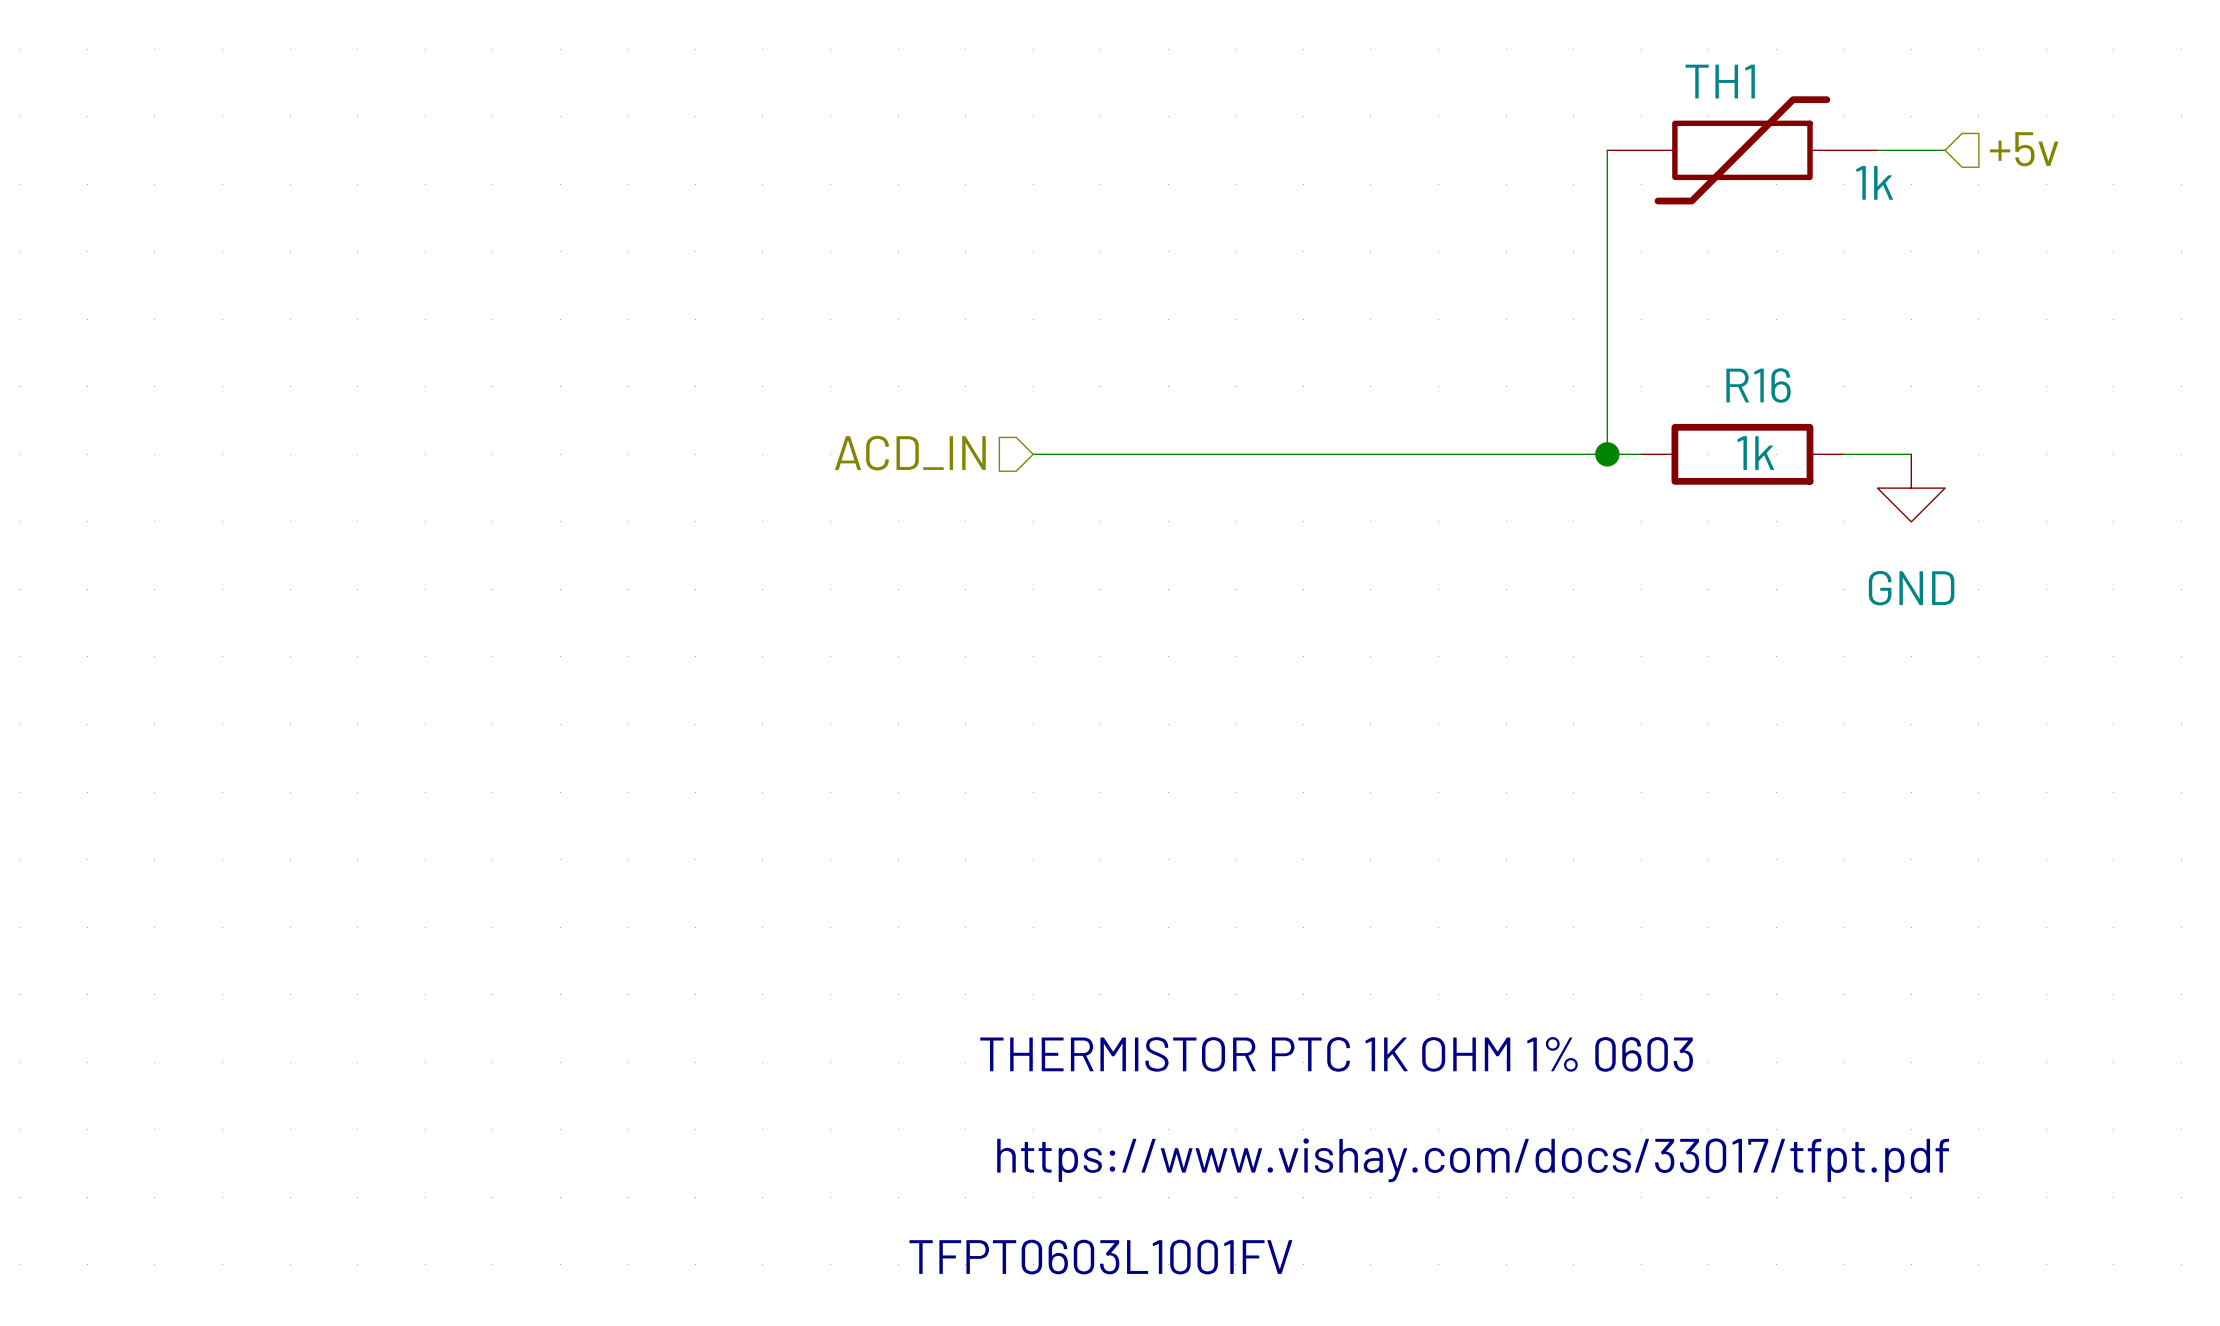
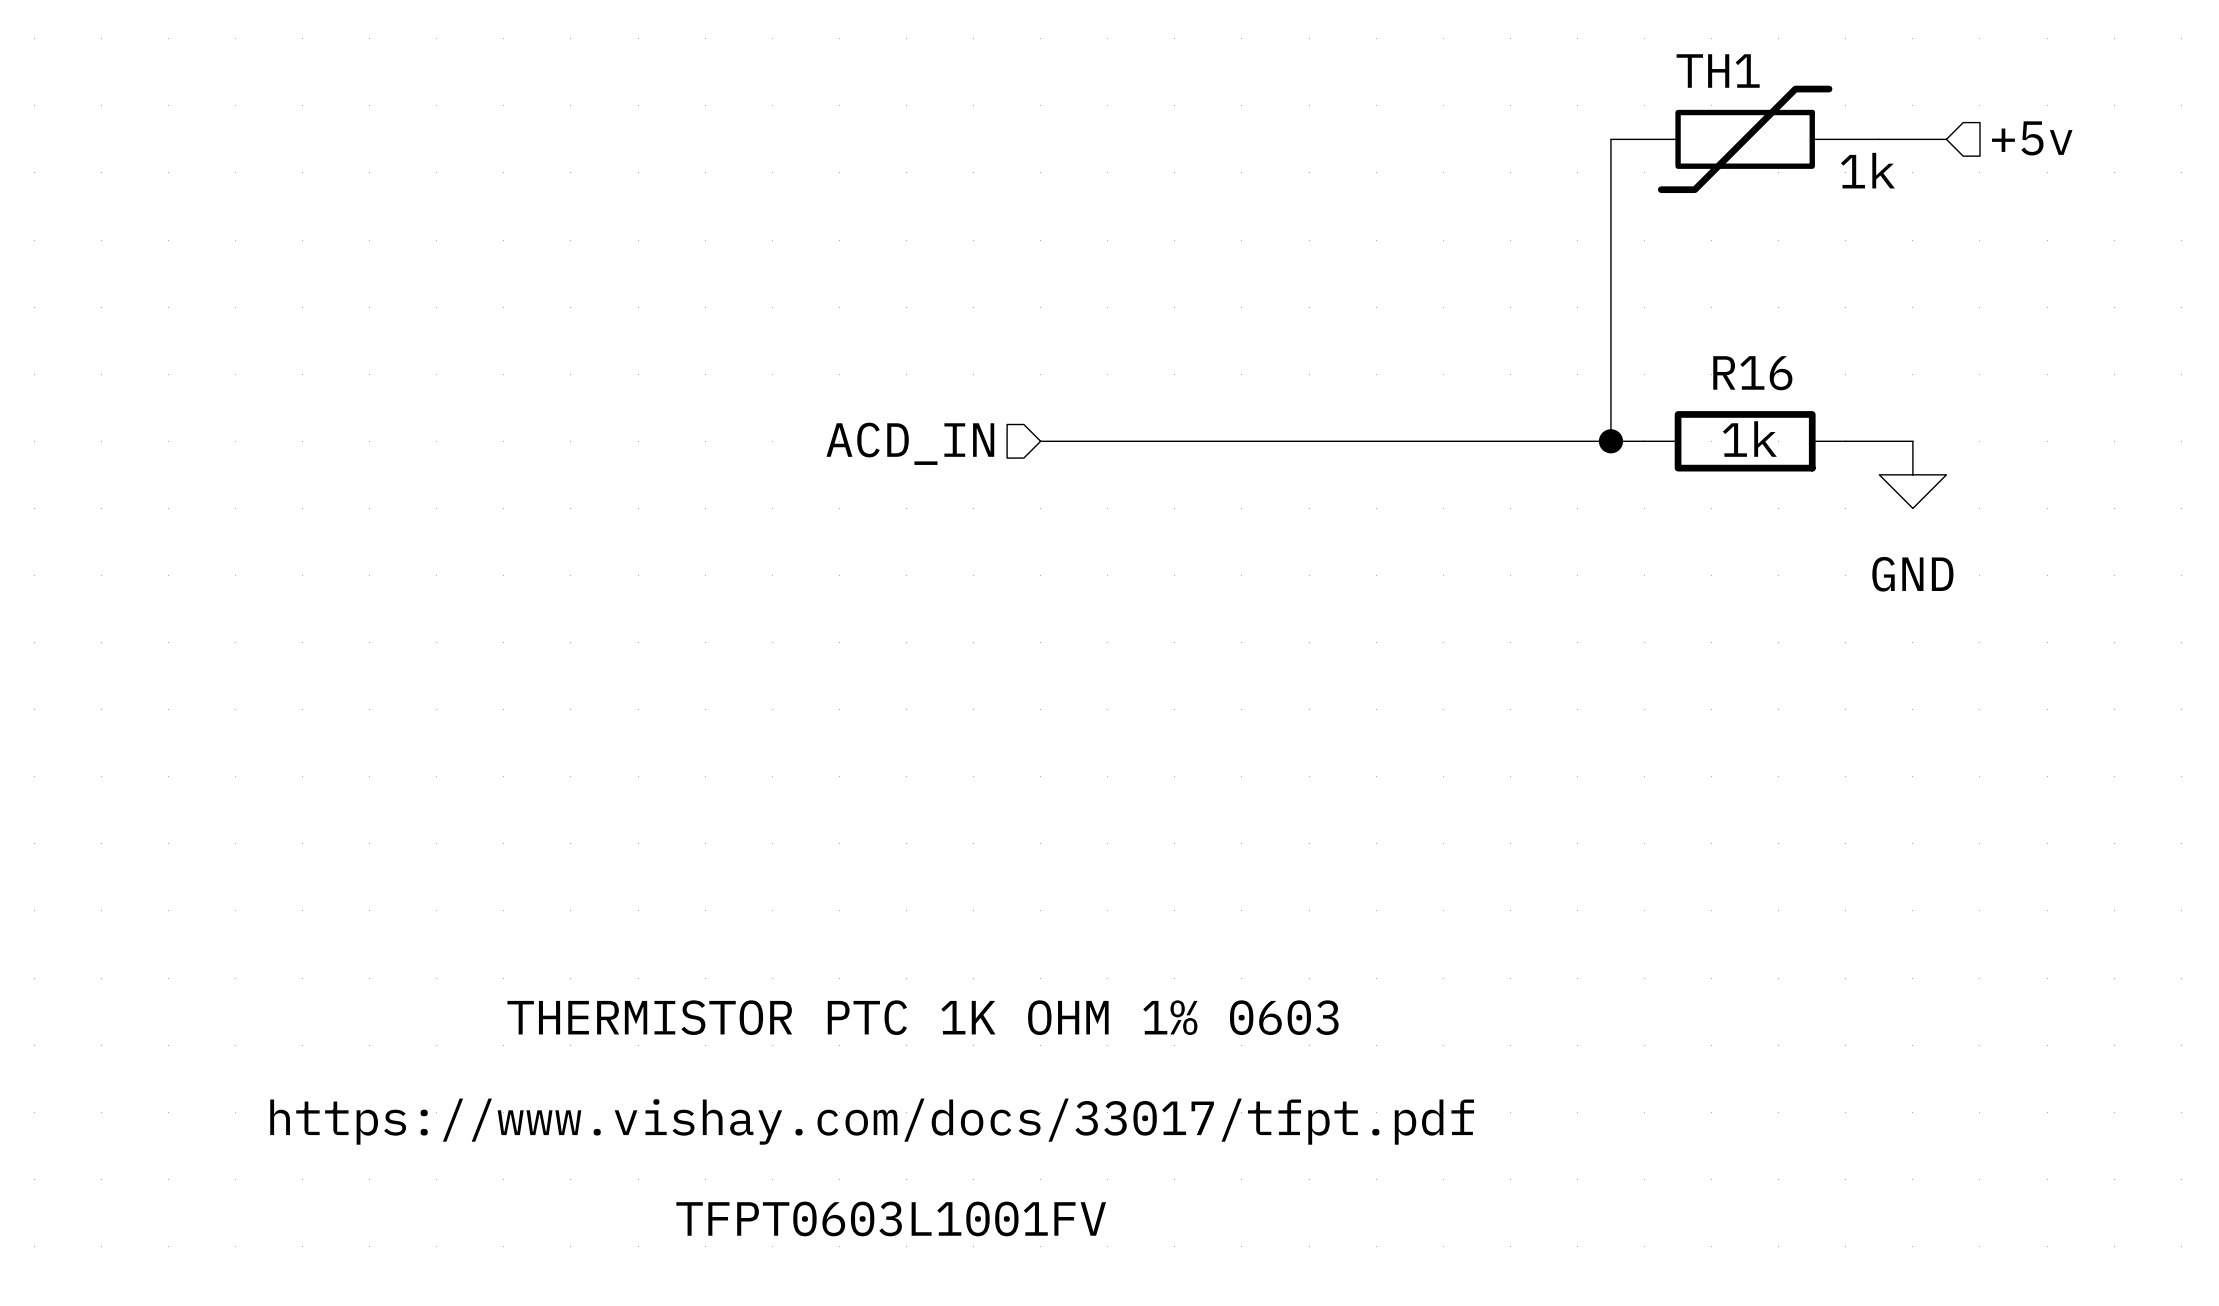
text position: THERMISTOR PTC 1K OHM 1% 0603 (1336, 1054) -> THERMISTOR PTC 1K OHM 1% 0603 (923, 1017)
text position: https://www.vishay.com/docs/33017/tfpt.pdf (1473, 1160) -> https://www.vishay.com/docs/33017/tfpt.pdf (872, 1121)
text position: TFPT0603L1001FV (1100, 1257) -> TFPT0603L1001FV (891, 1218)

